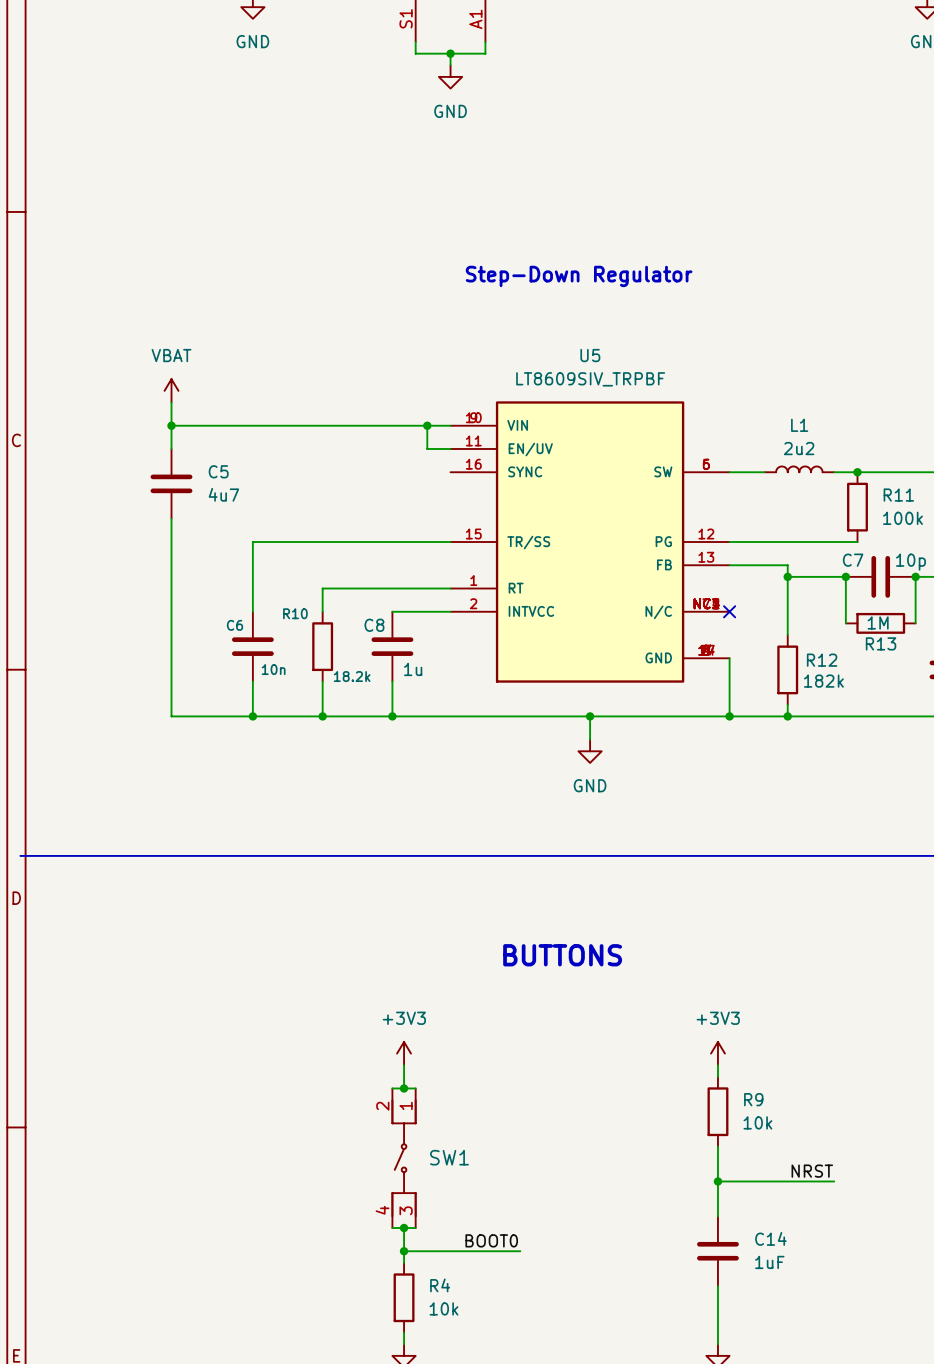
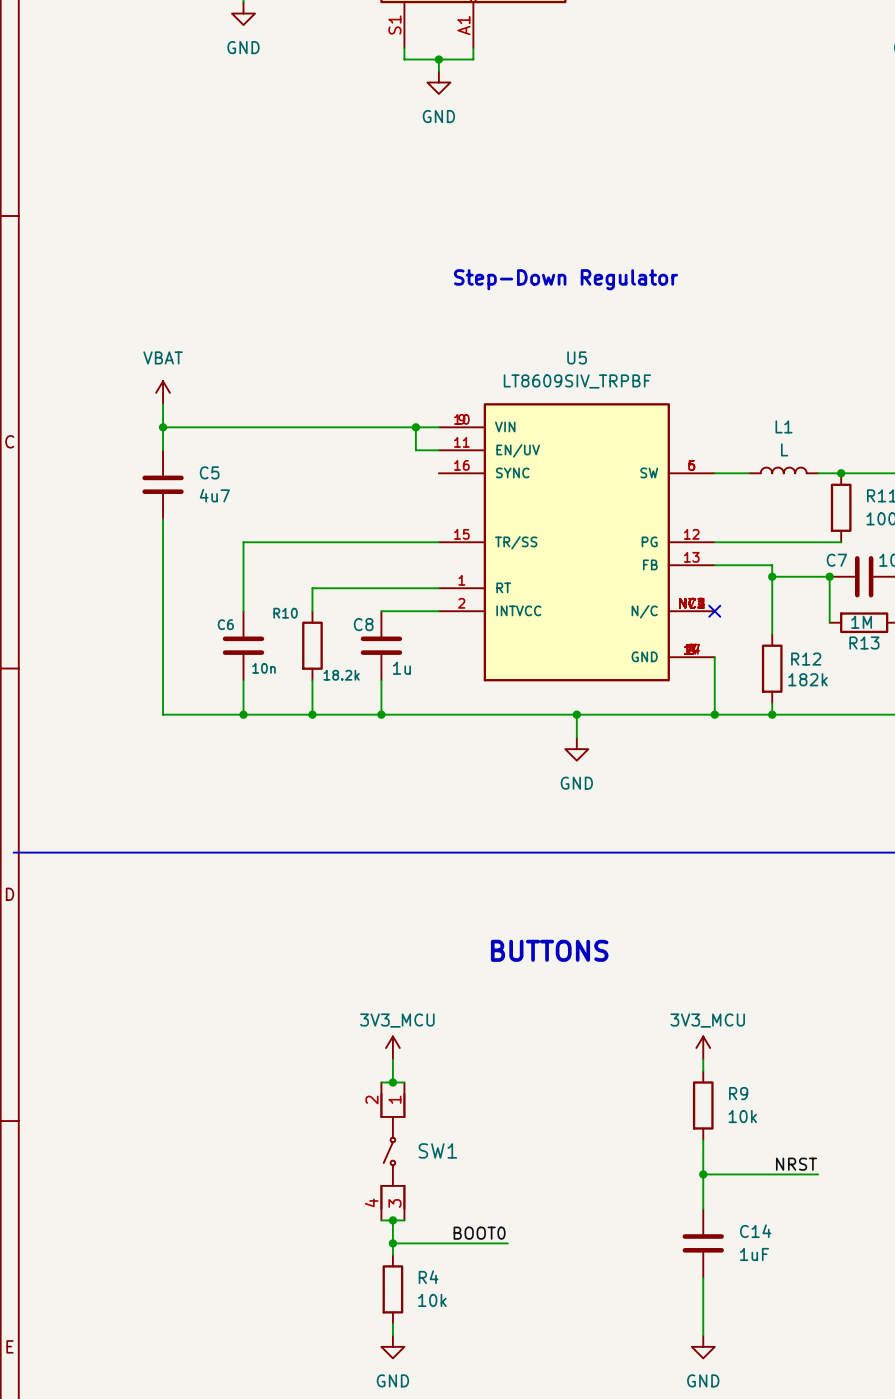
L1 value: 2u2 (799, 448) -> L (784, 449)
power symbol: +3V3 (404, 1053) -> 3V3_MCU (392, 1048)
power symbol: +3V3 (717, 1053) -> 3V3_MCU (703, 1048)

